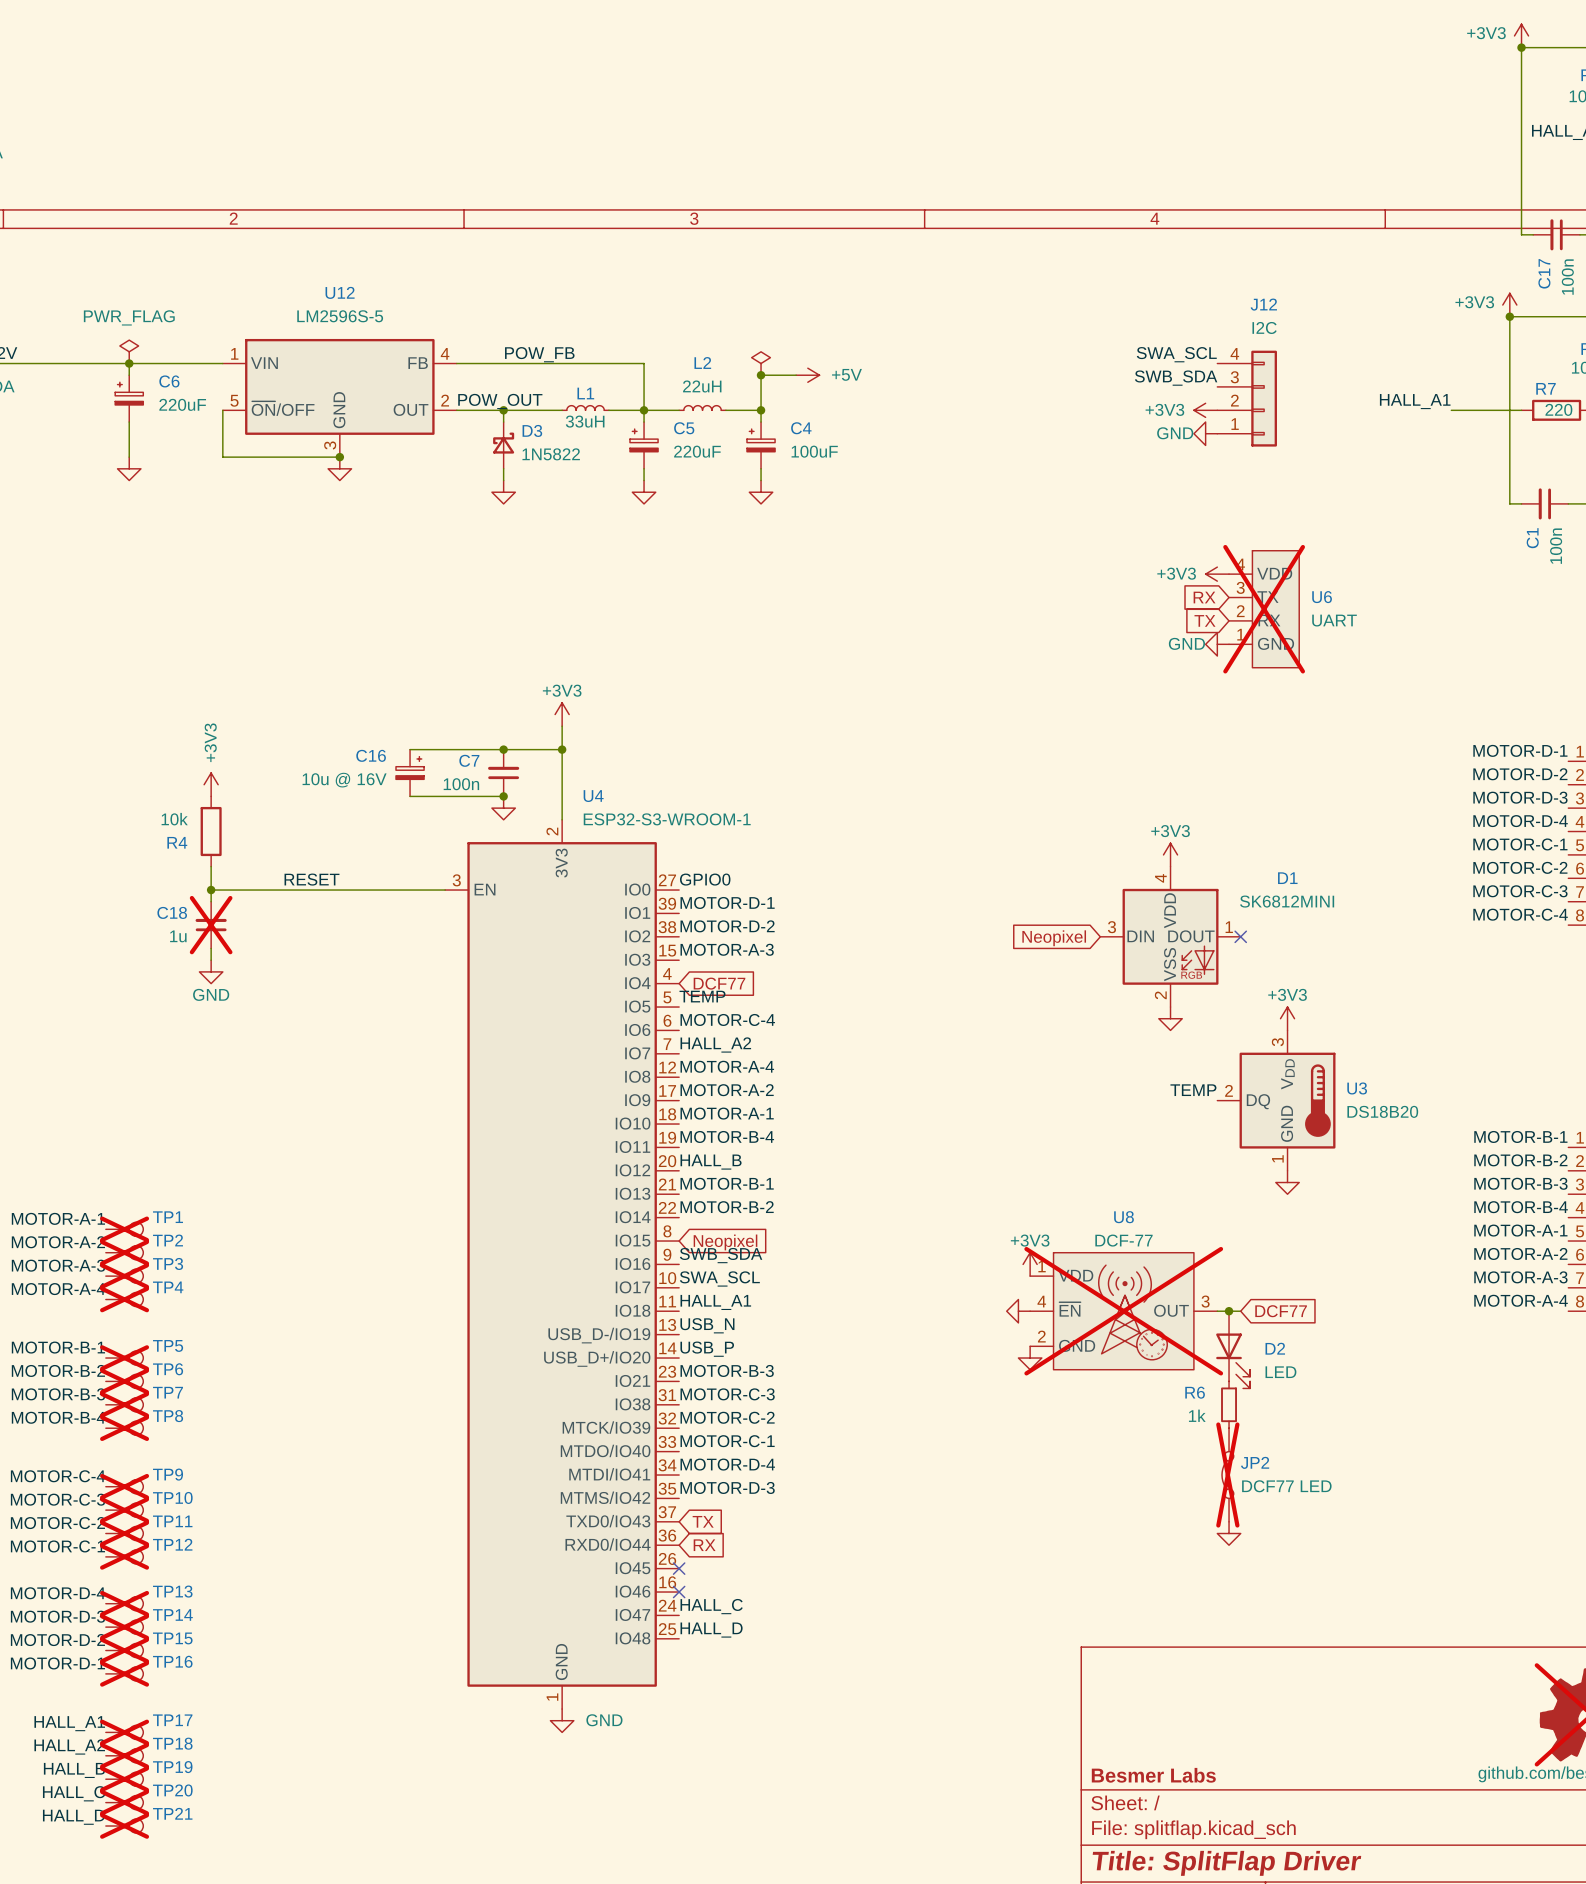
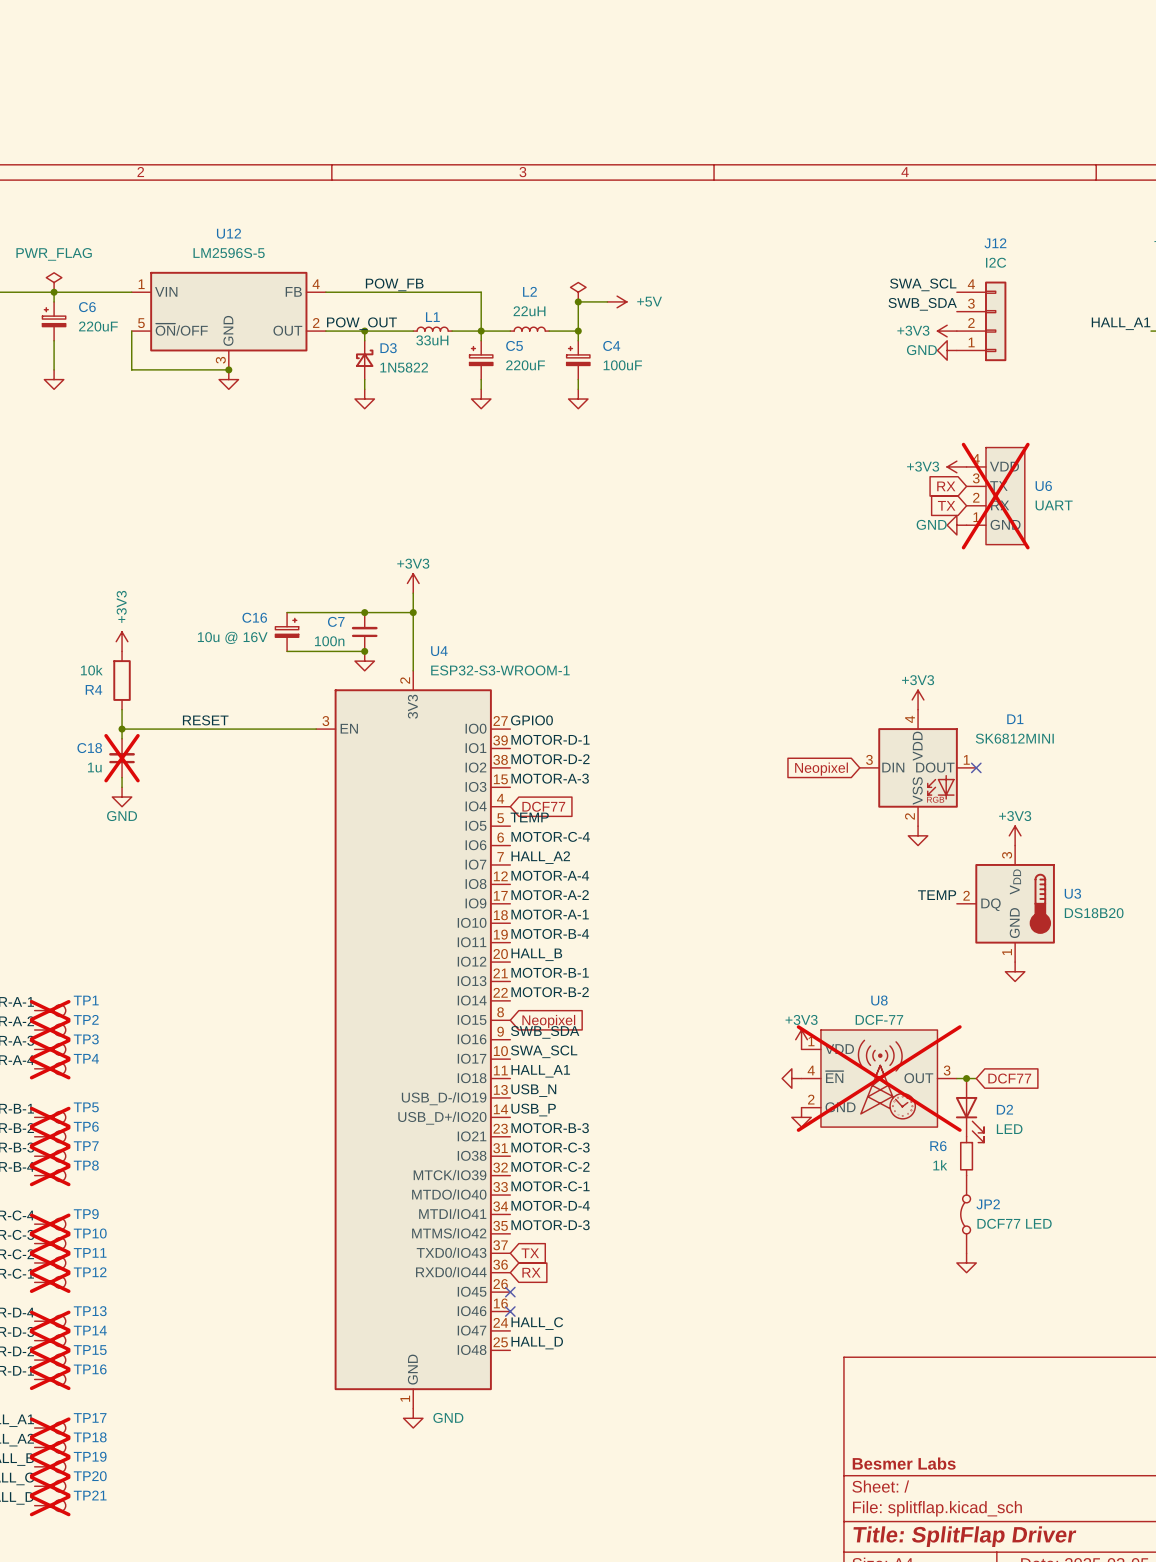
JP2 do-not-place cross: (1227, 1475) -> none

